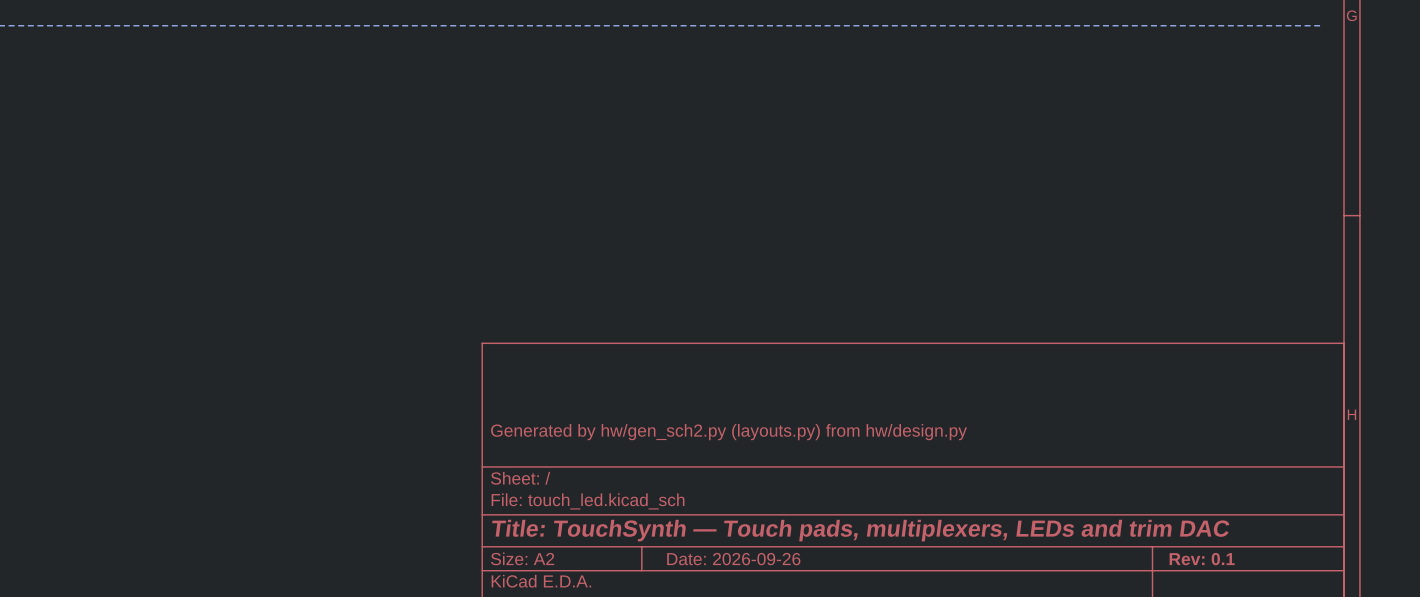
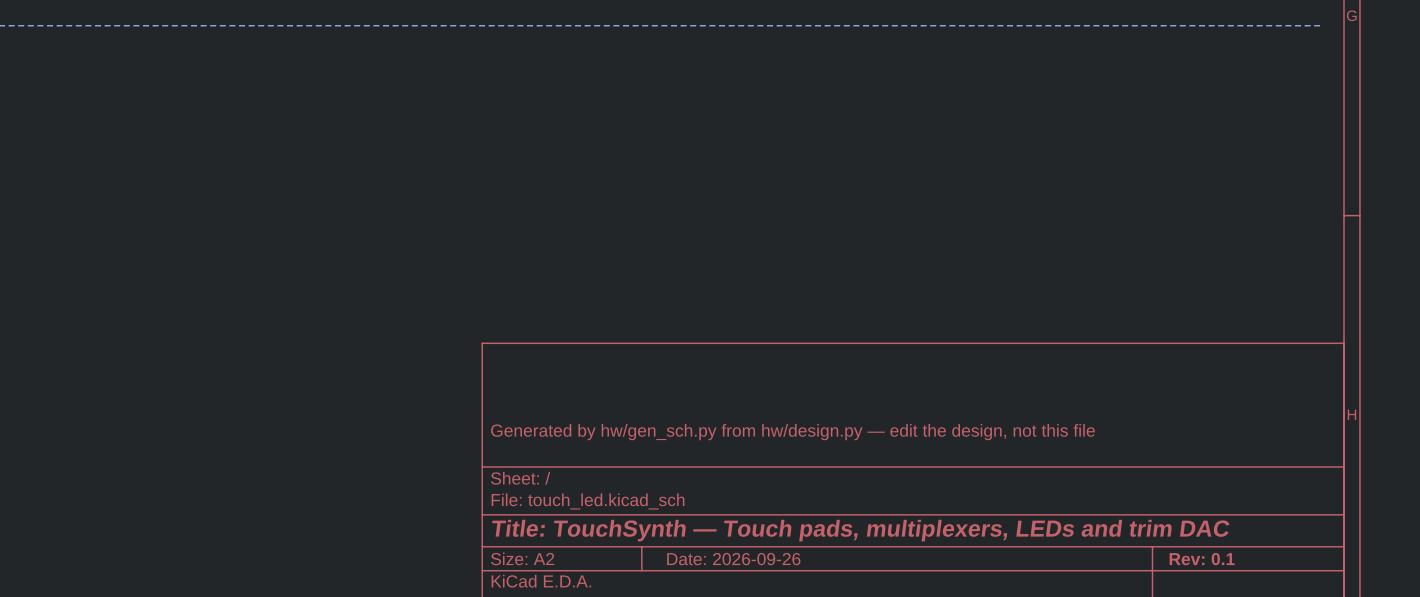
title block: Generated by hw/gen_sch2.py (layouts.py) from hw/design.py (729, 432) -> Generated by hw/gen_sch.py from hw/design.py — edit the design, not this file (792, 432)

